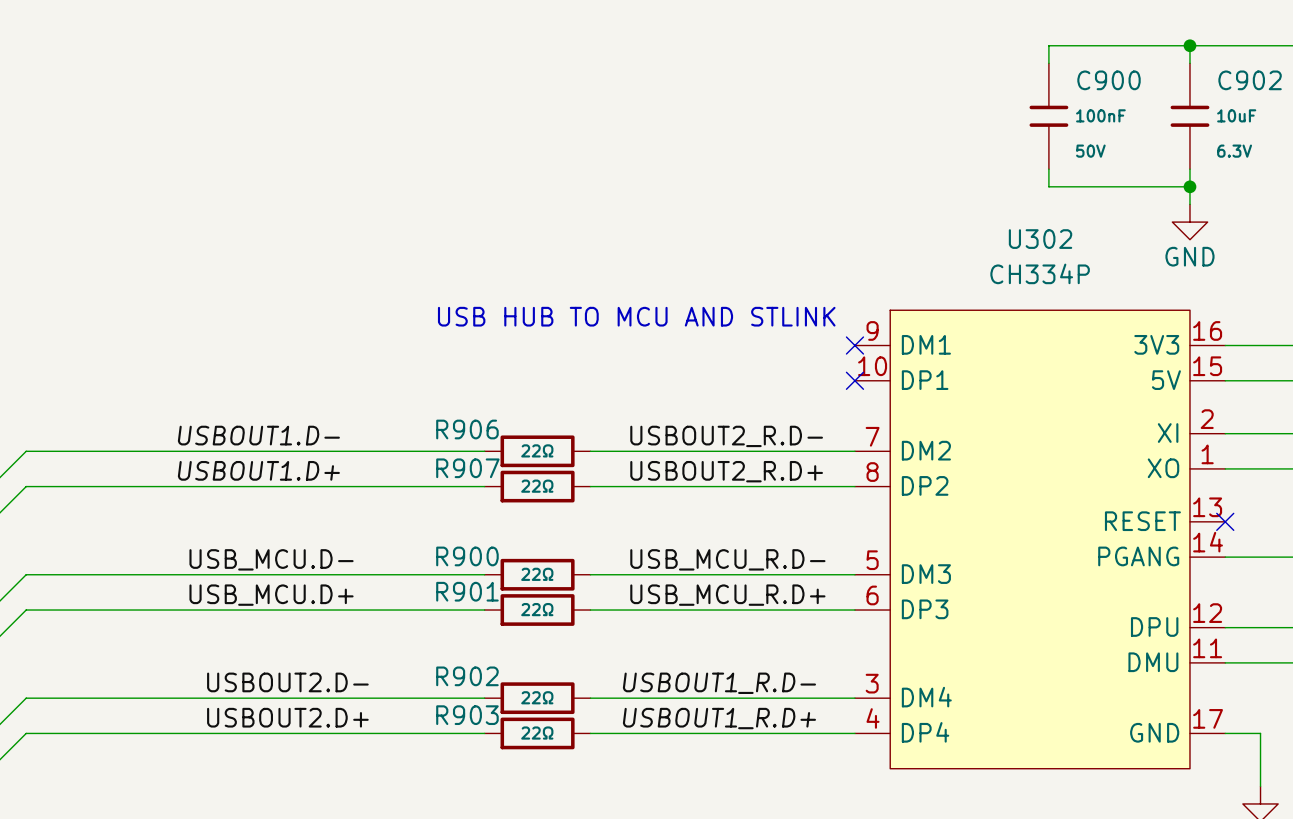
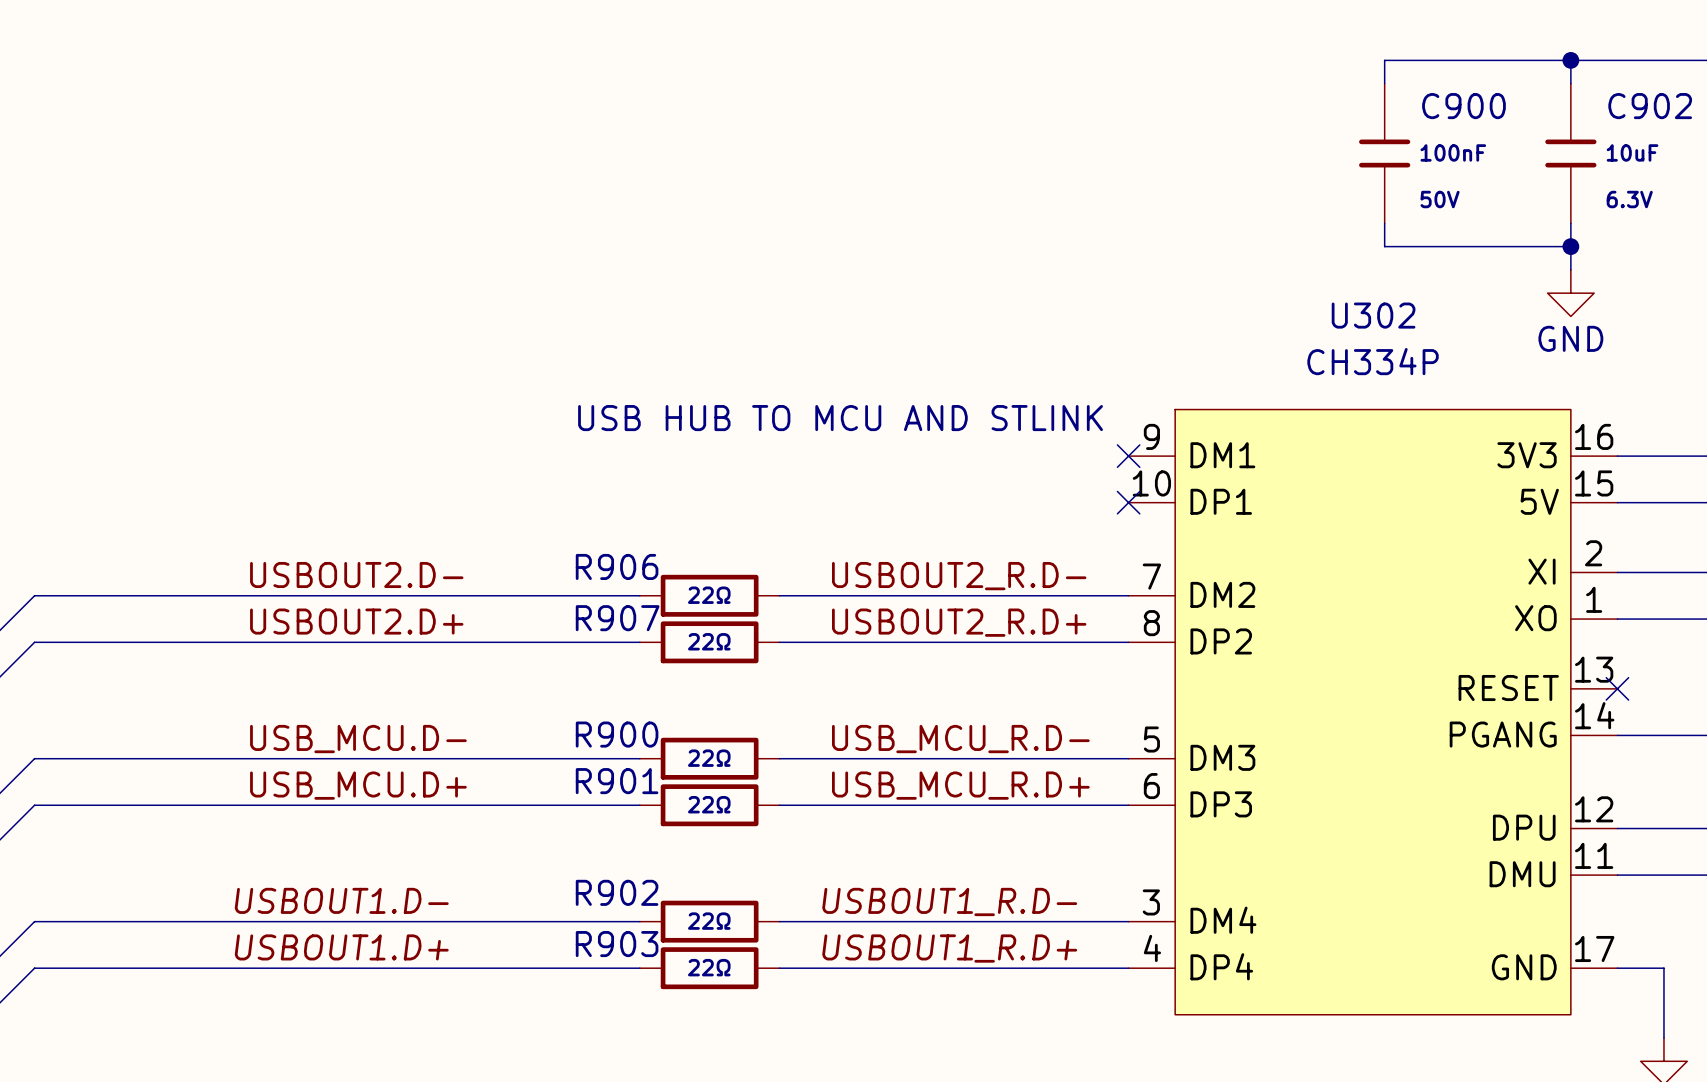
label position: USBOUT1.D- (258, 435) -> USBOUT1.D- (341, 900)
label position: USBOUT1.D+ (258, 470) -> USBOUT1.D+ (341, 947)
label position: USBOUT2.D- (287, 682) -> USBOUT2.D- (356, 574)
label position: USBOUT2.D+ (287, 717) -> USBOUT2.D+ (356, 621)

